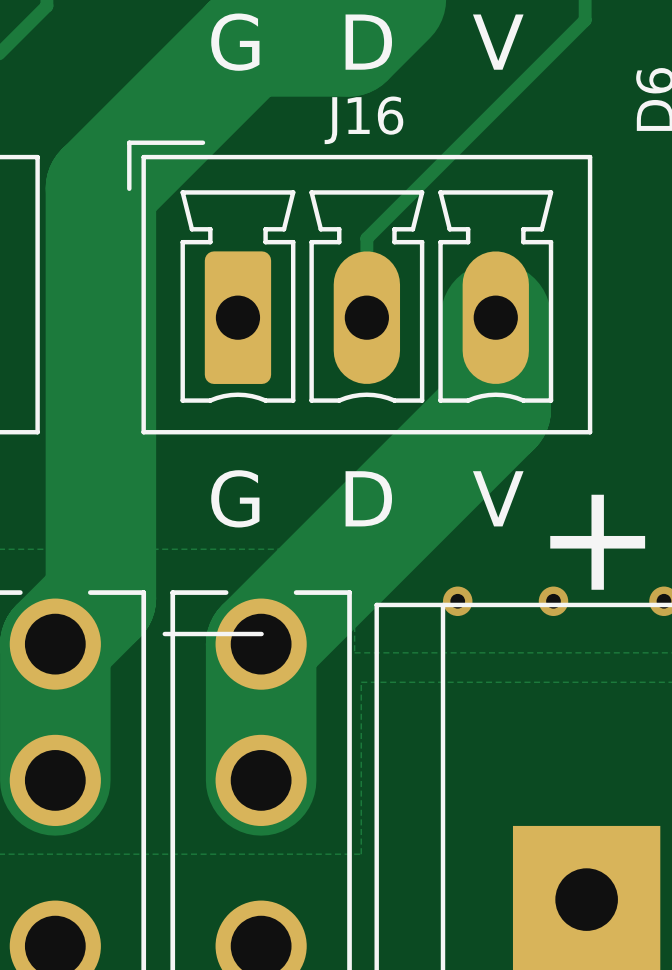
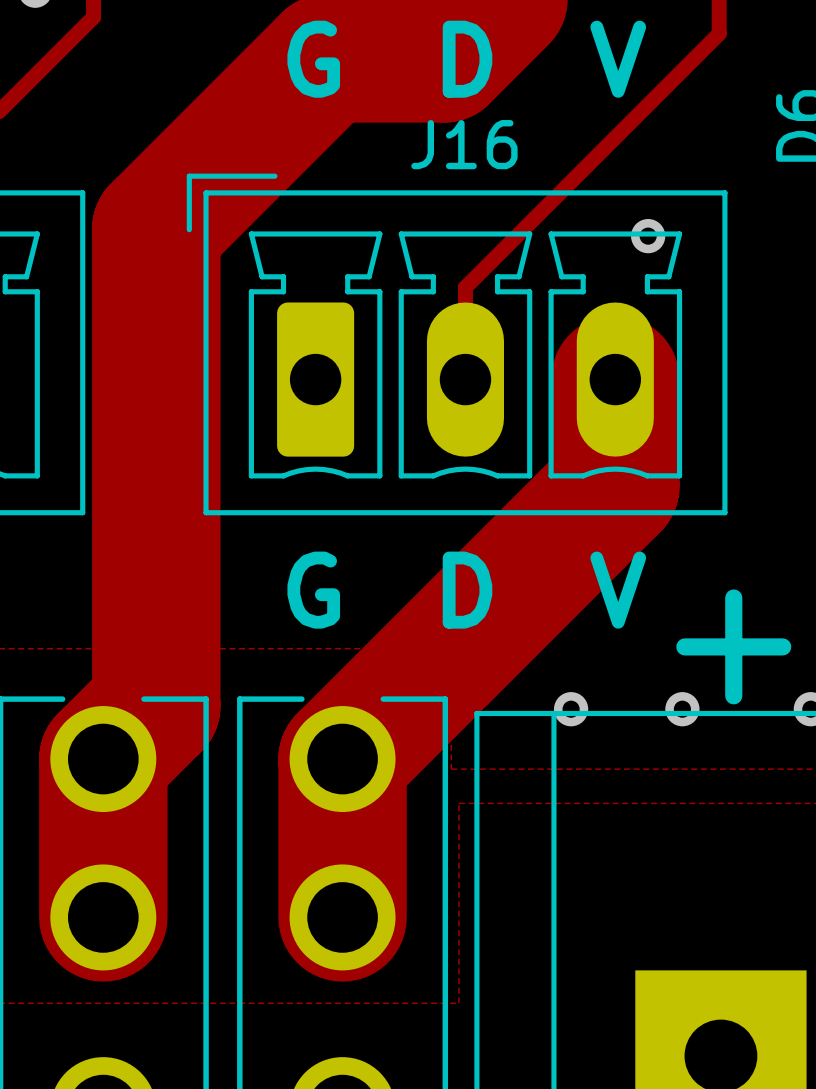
via: none -> (648, 236)
line: (164, 634) (261, 634) -> none

